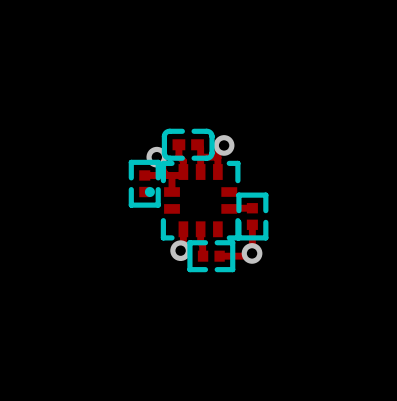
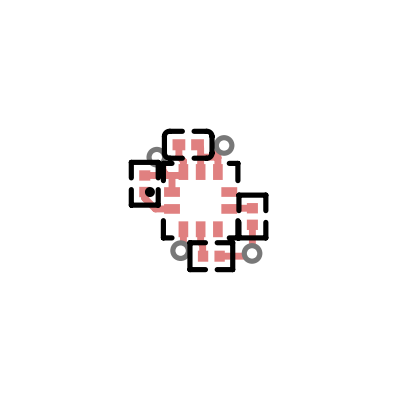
track: none -> (144, 192) (144, 198) (155, 208) (172, 208)

